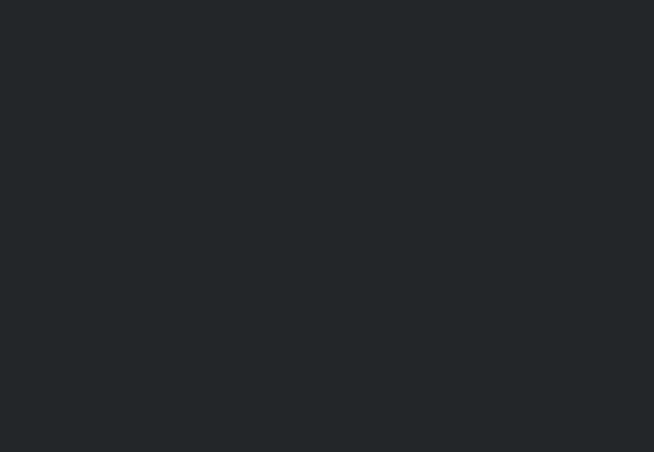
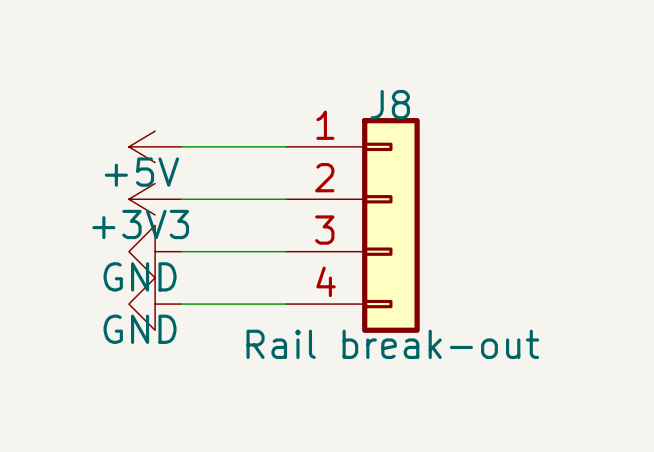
power symbol: none -> +5V (155, 146)
wire: none -> (181, 146) (286, 146)
power symbol: none -> +3V3 (155, 199)
wire: none -> (181, 199) (286, 199)
J8: none -> Rail break-out (352, 225)
power symbol: none -> GND (155, 251)
wire: none -> (181, 251) (286, 251)
power symbol: none -> GND (155, 304)
wire: none -> (181, 304) (286, 304)

